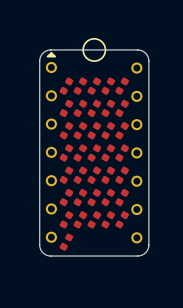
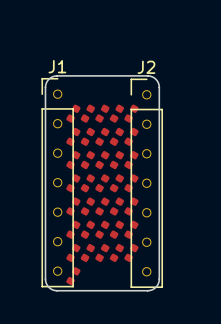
drawing: [82, 37, 107, 62] -> none
drawing: [46, 51, 57, 58] -> none
part: (51, 152) -> none
J1: none -> (57, 182)
part: (136, 152) -> none
J2: none -> (146, 183)

